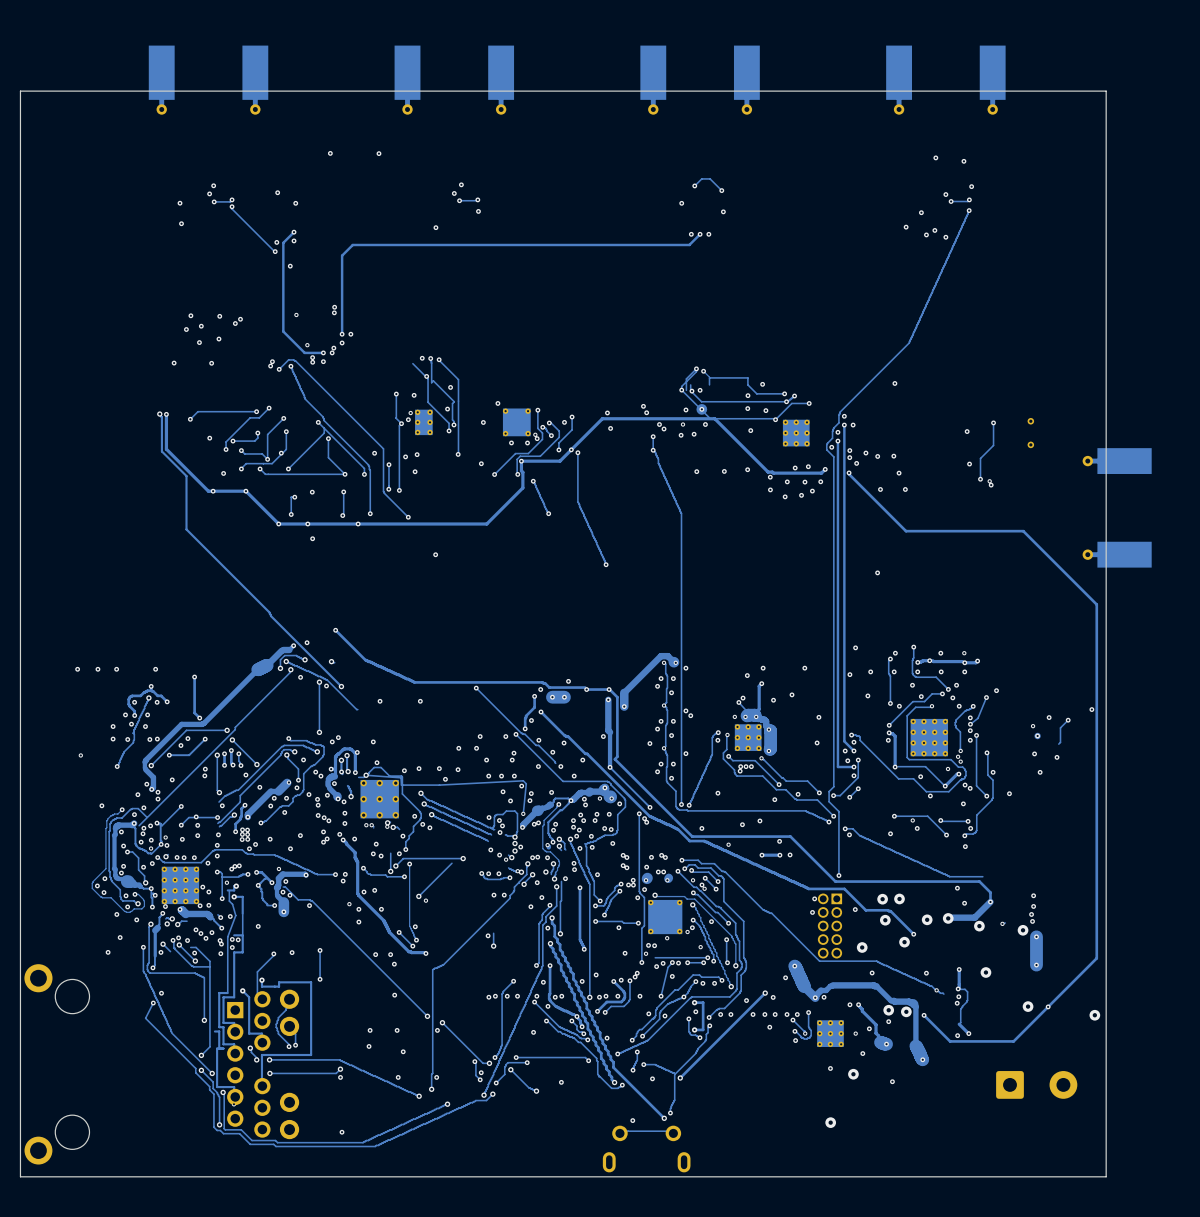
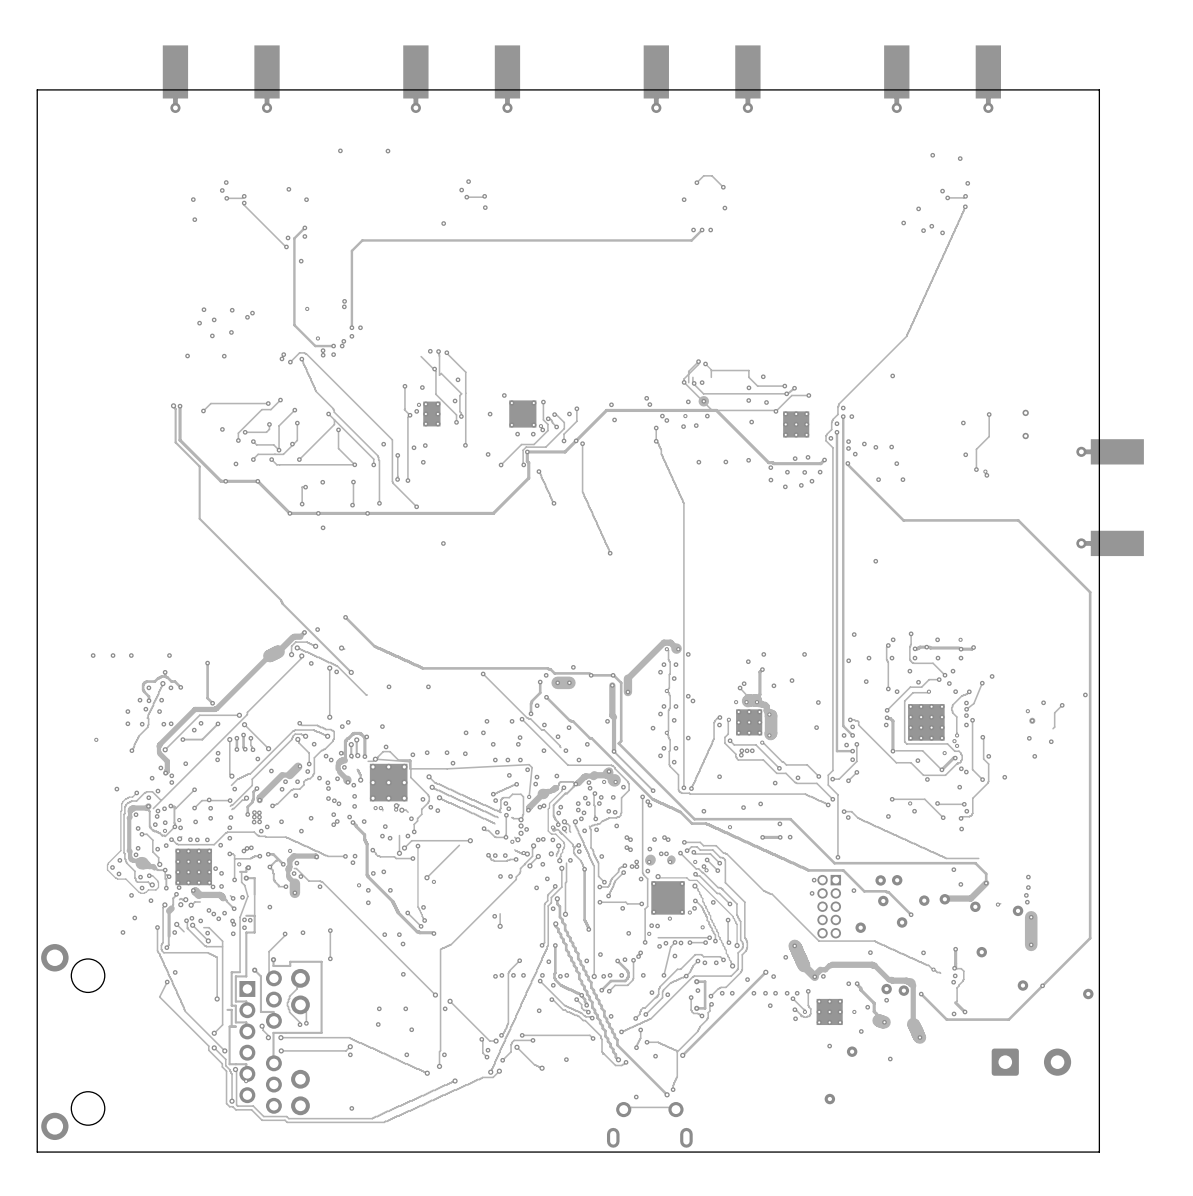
track: none -> (514, 784) (493, 794)
track: none -> (594, 793) (595, 816)
via: none -> (594, 793)
via: none -> (493, 794)
track: none -> (506, 816) (506, 835)
track: none -> (484, 828) (495, 837) (504, 837)
via: none -> (484, 828)
track: none -> (555, 829) (558, 829) (574, 847)
track: none -> (577, 846) (573, 852) (583, 867)

